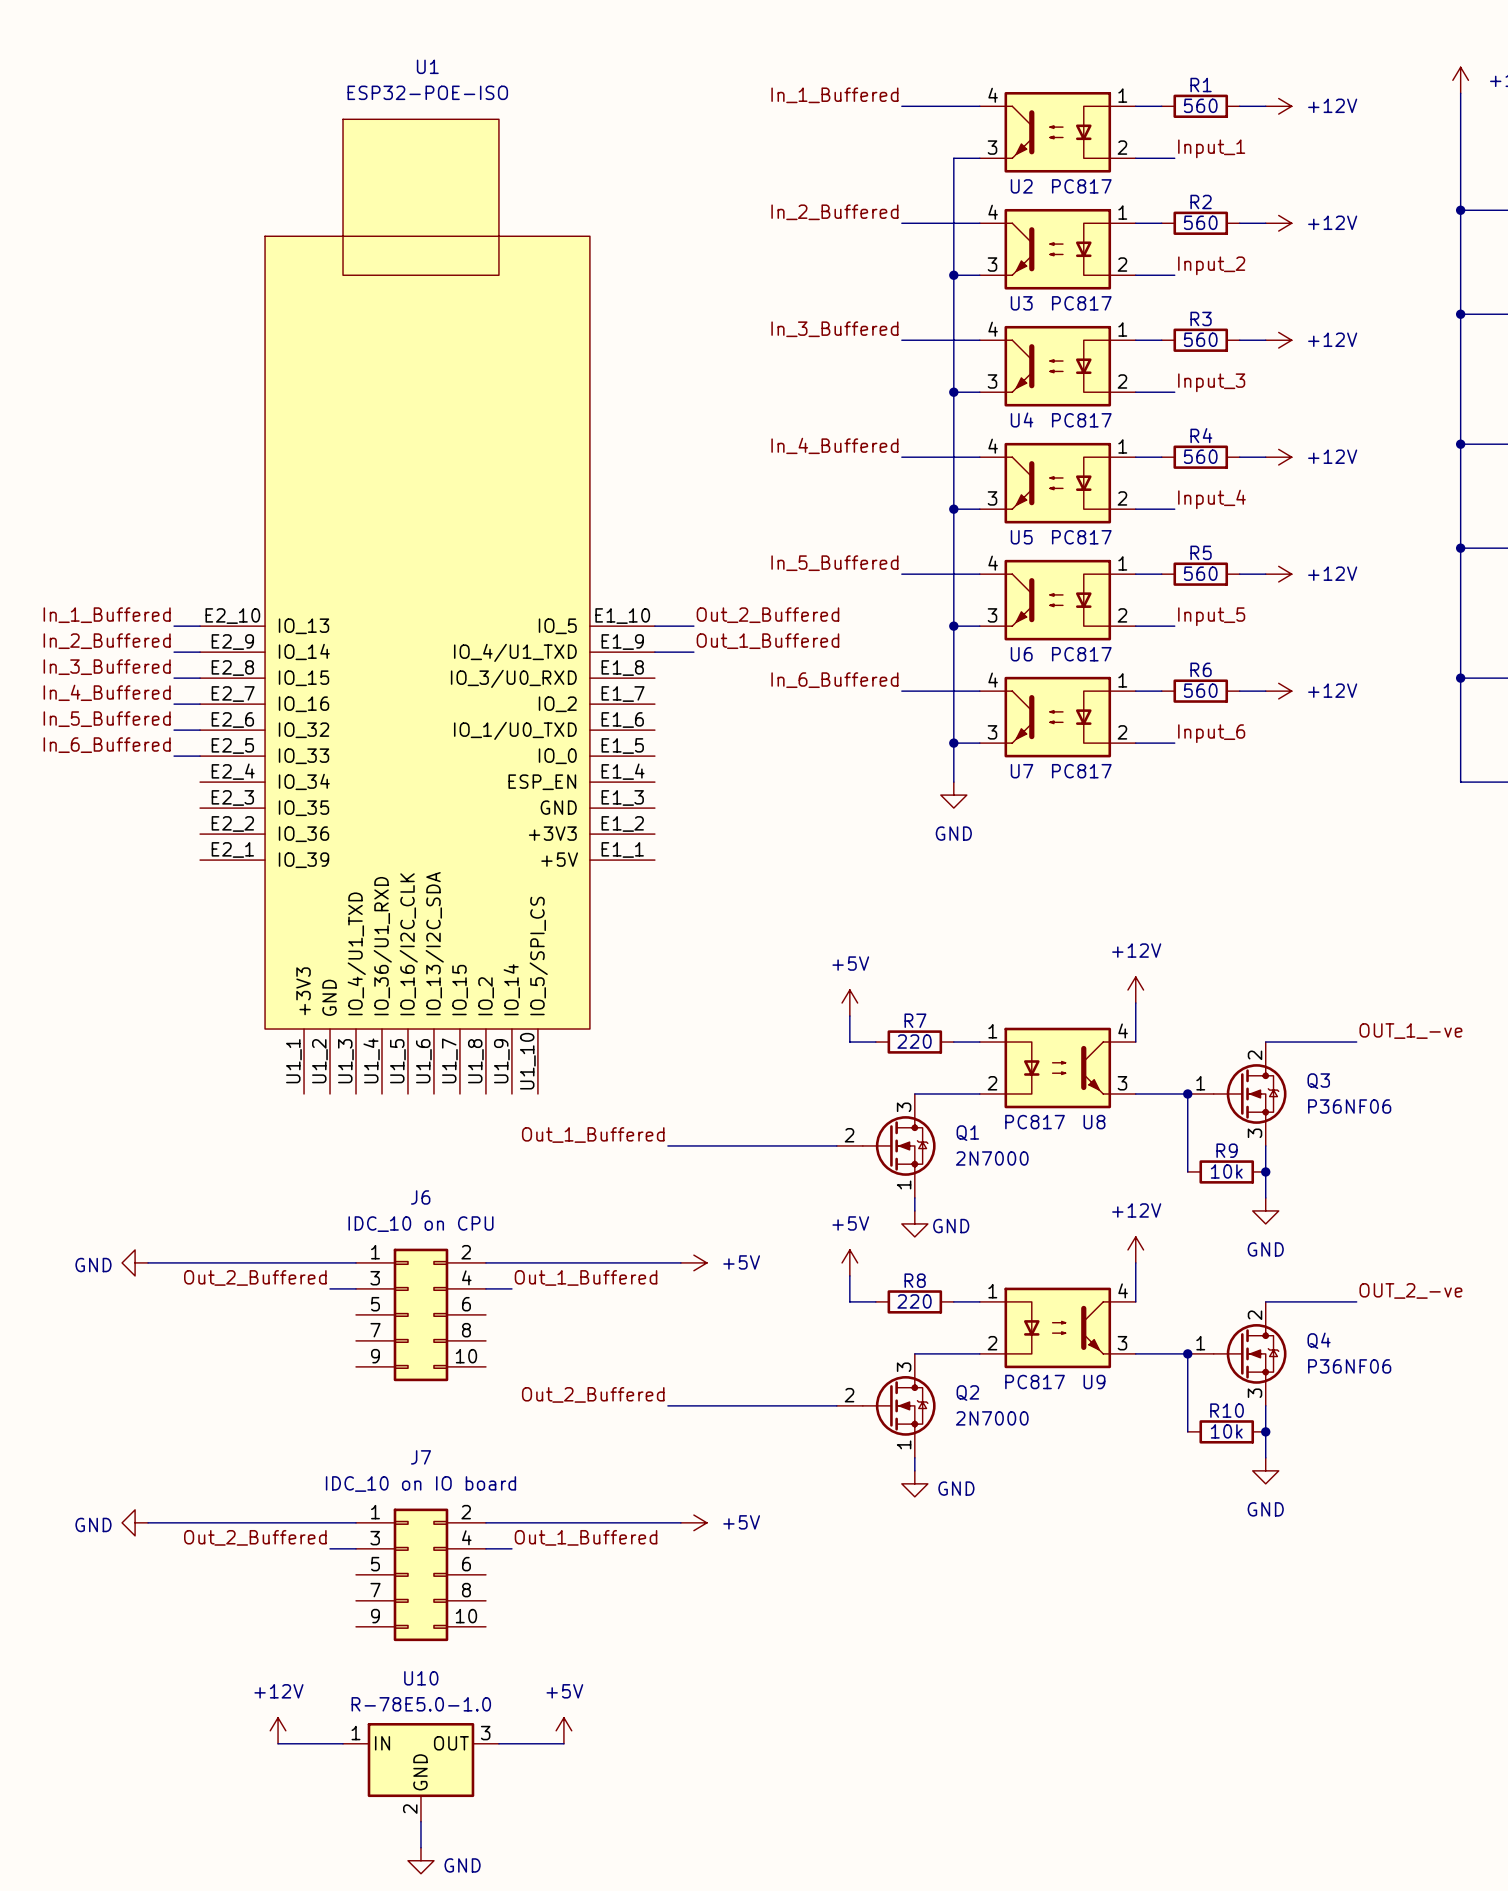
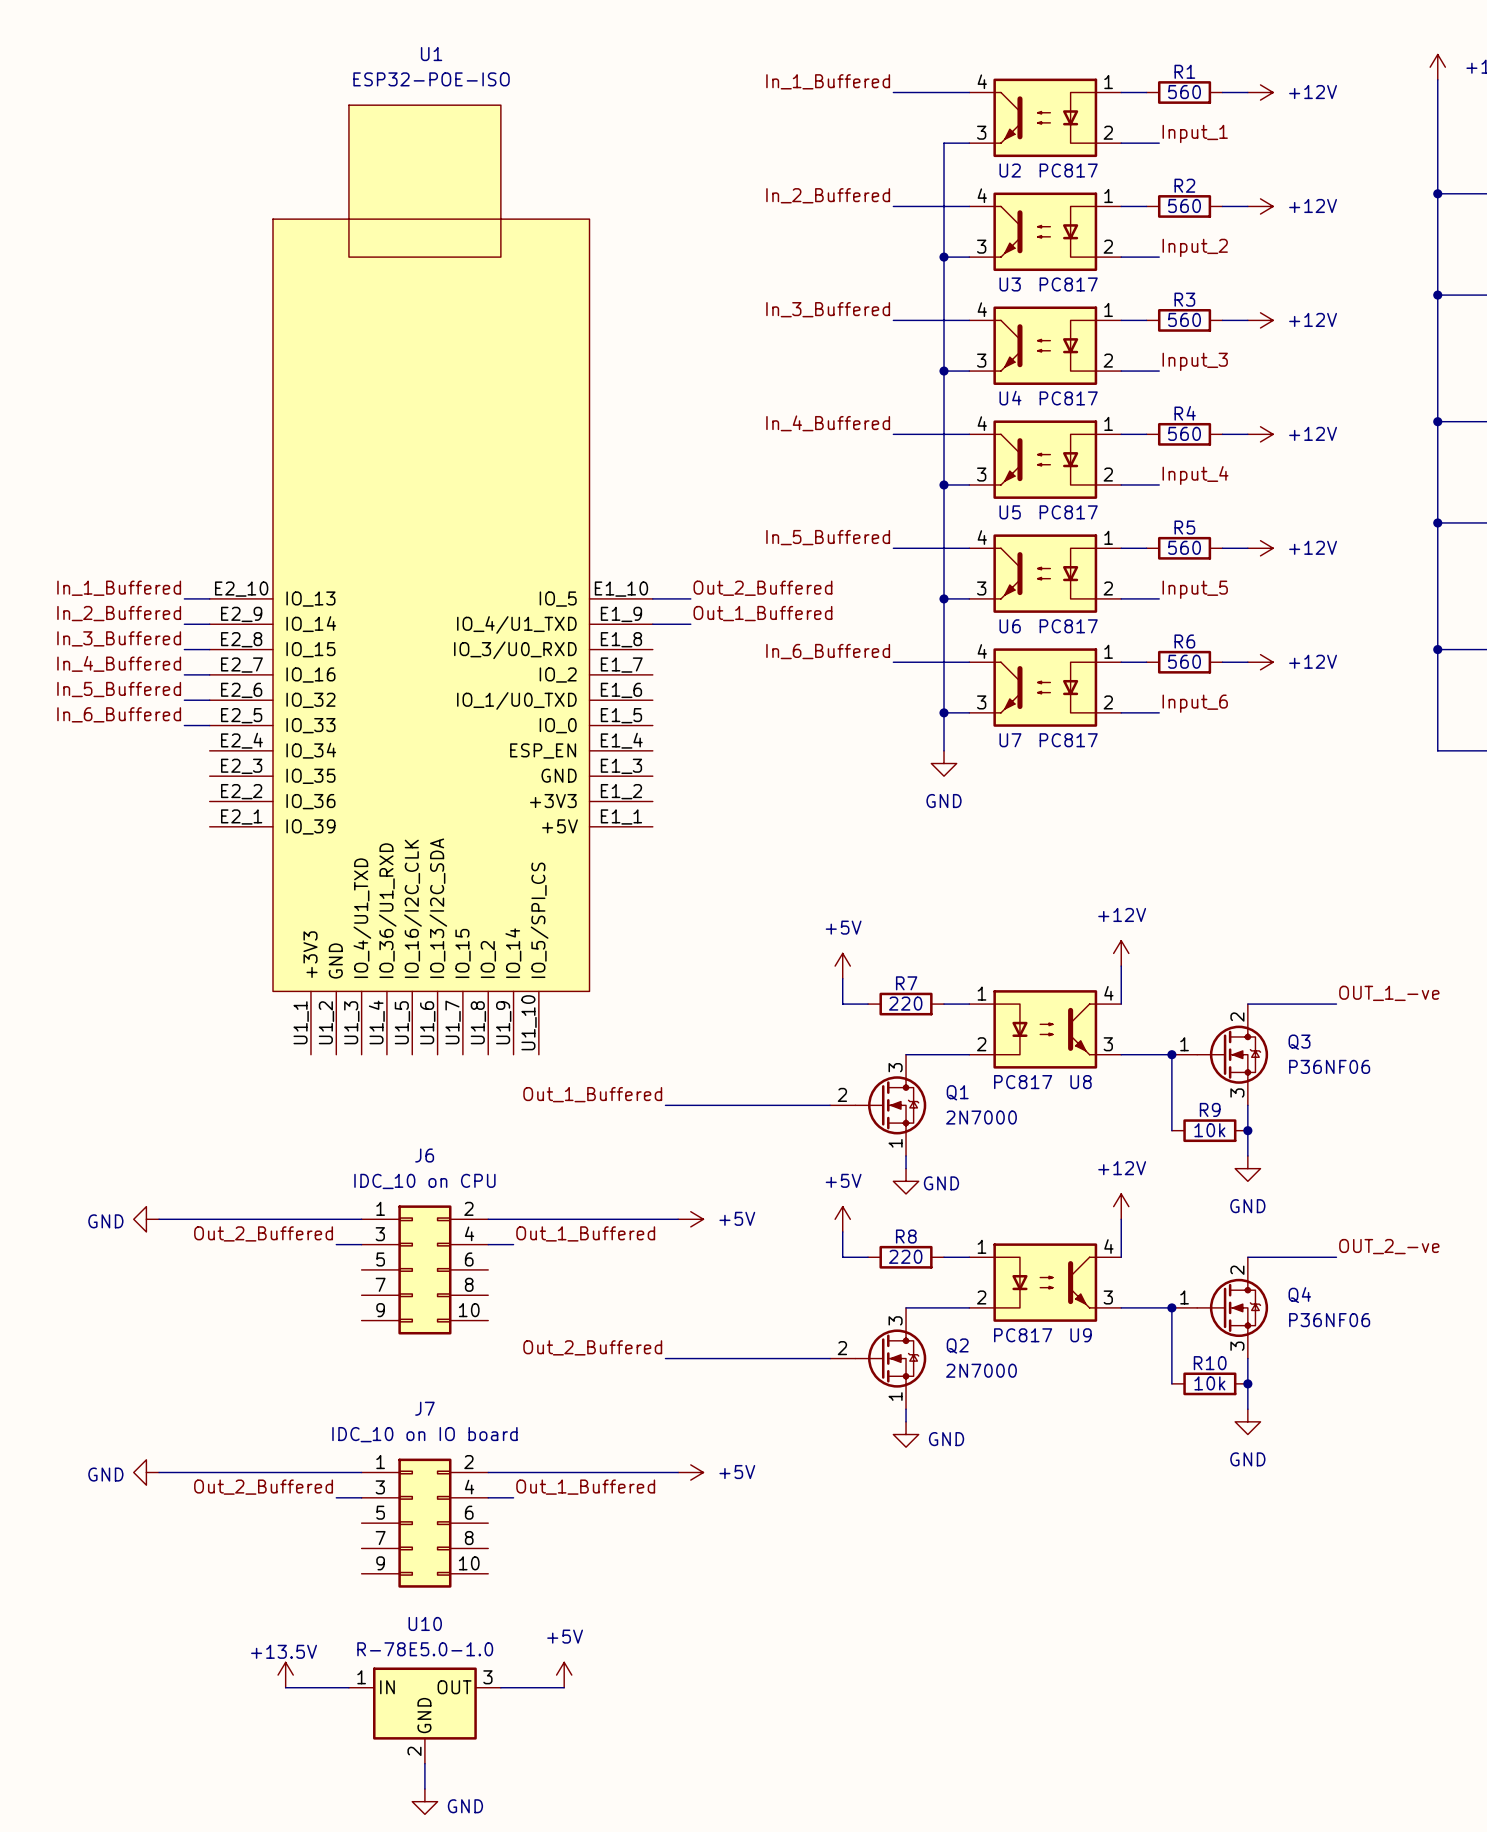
power symbol: +12V (278, 1730) -> +13.5V (285, 1675)

